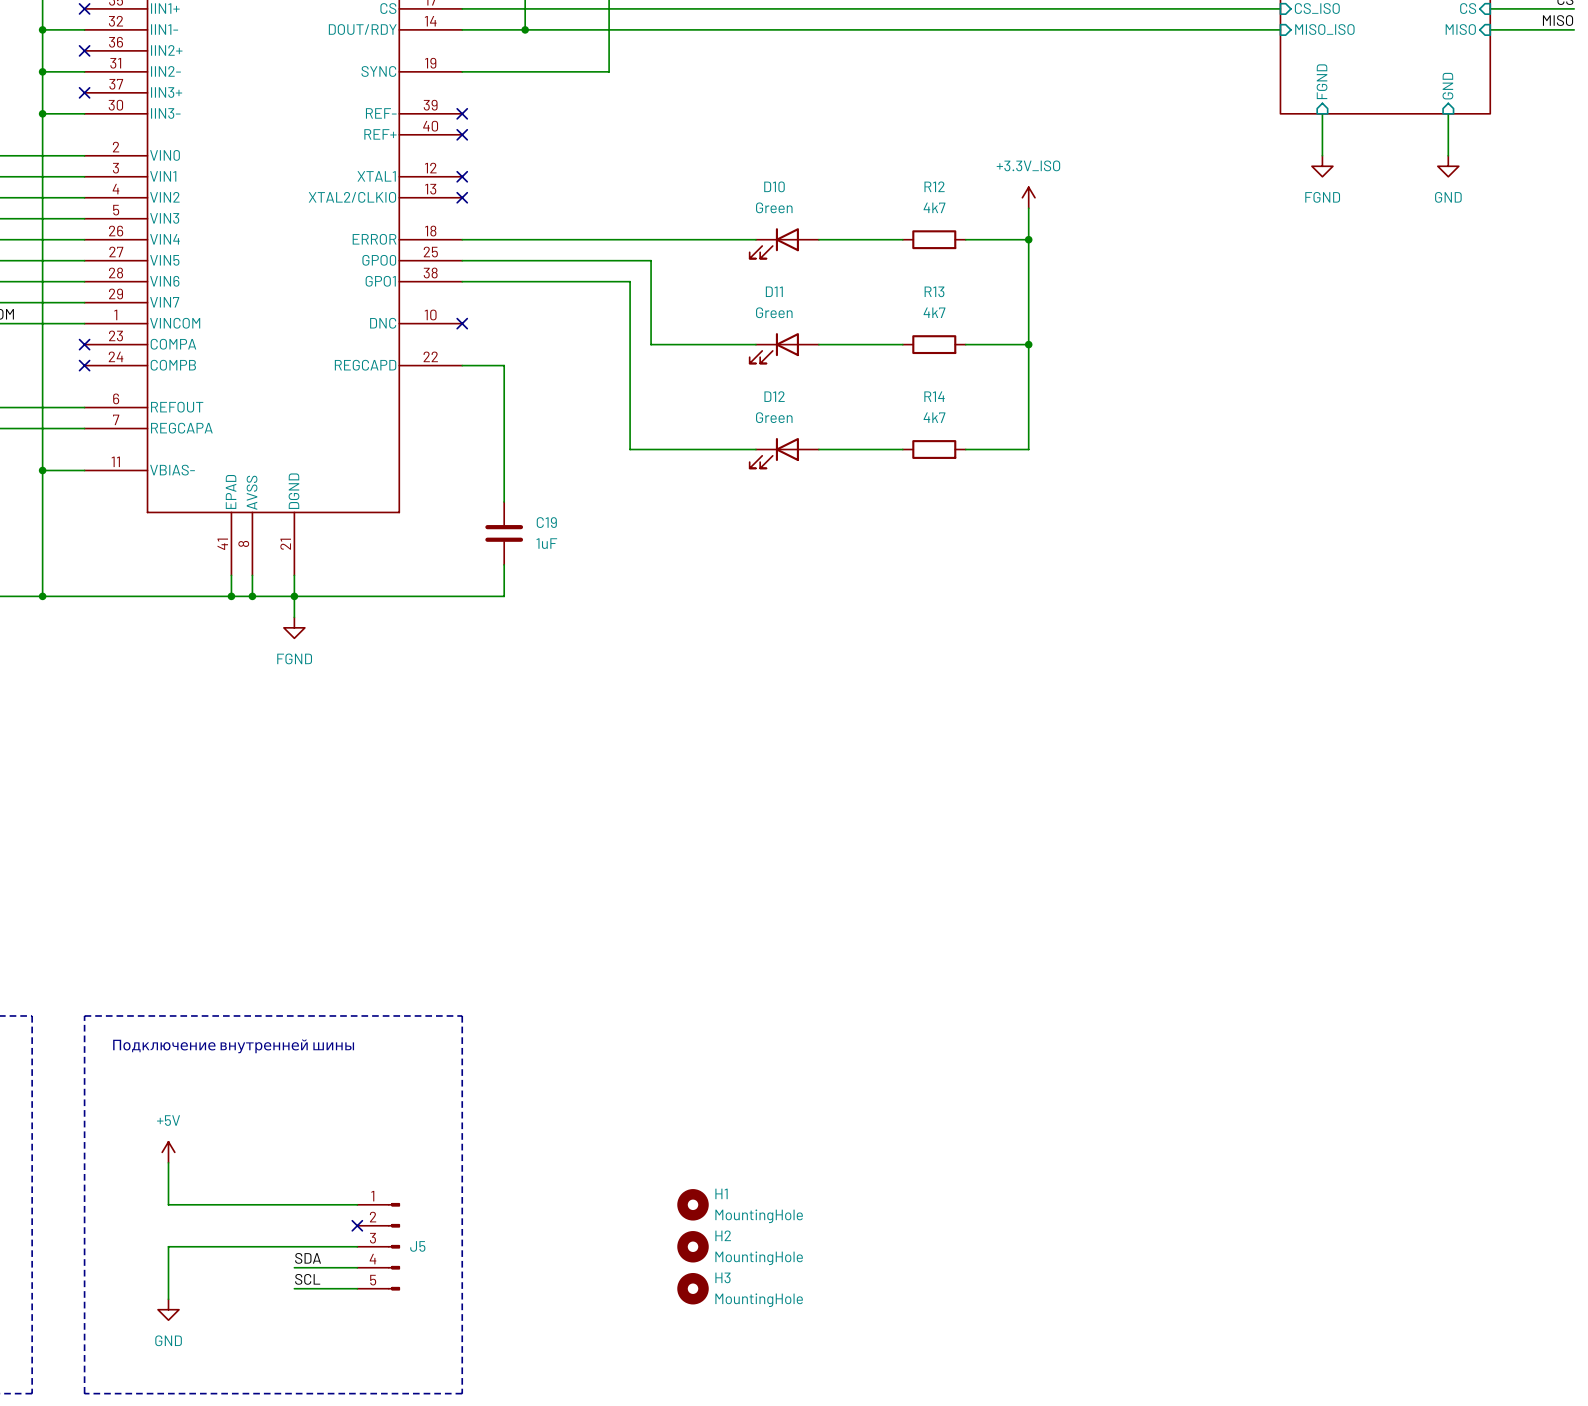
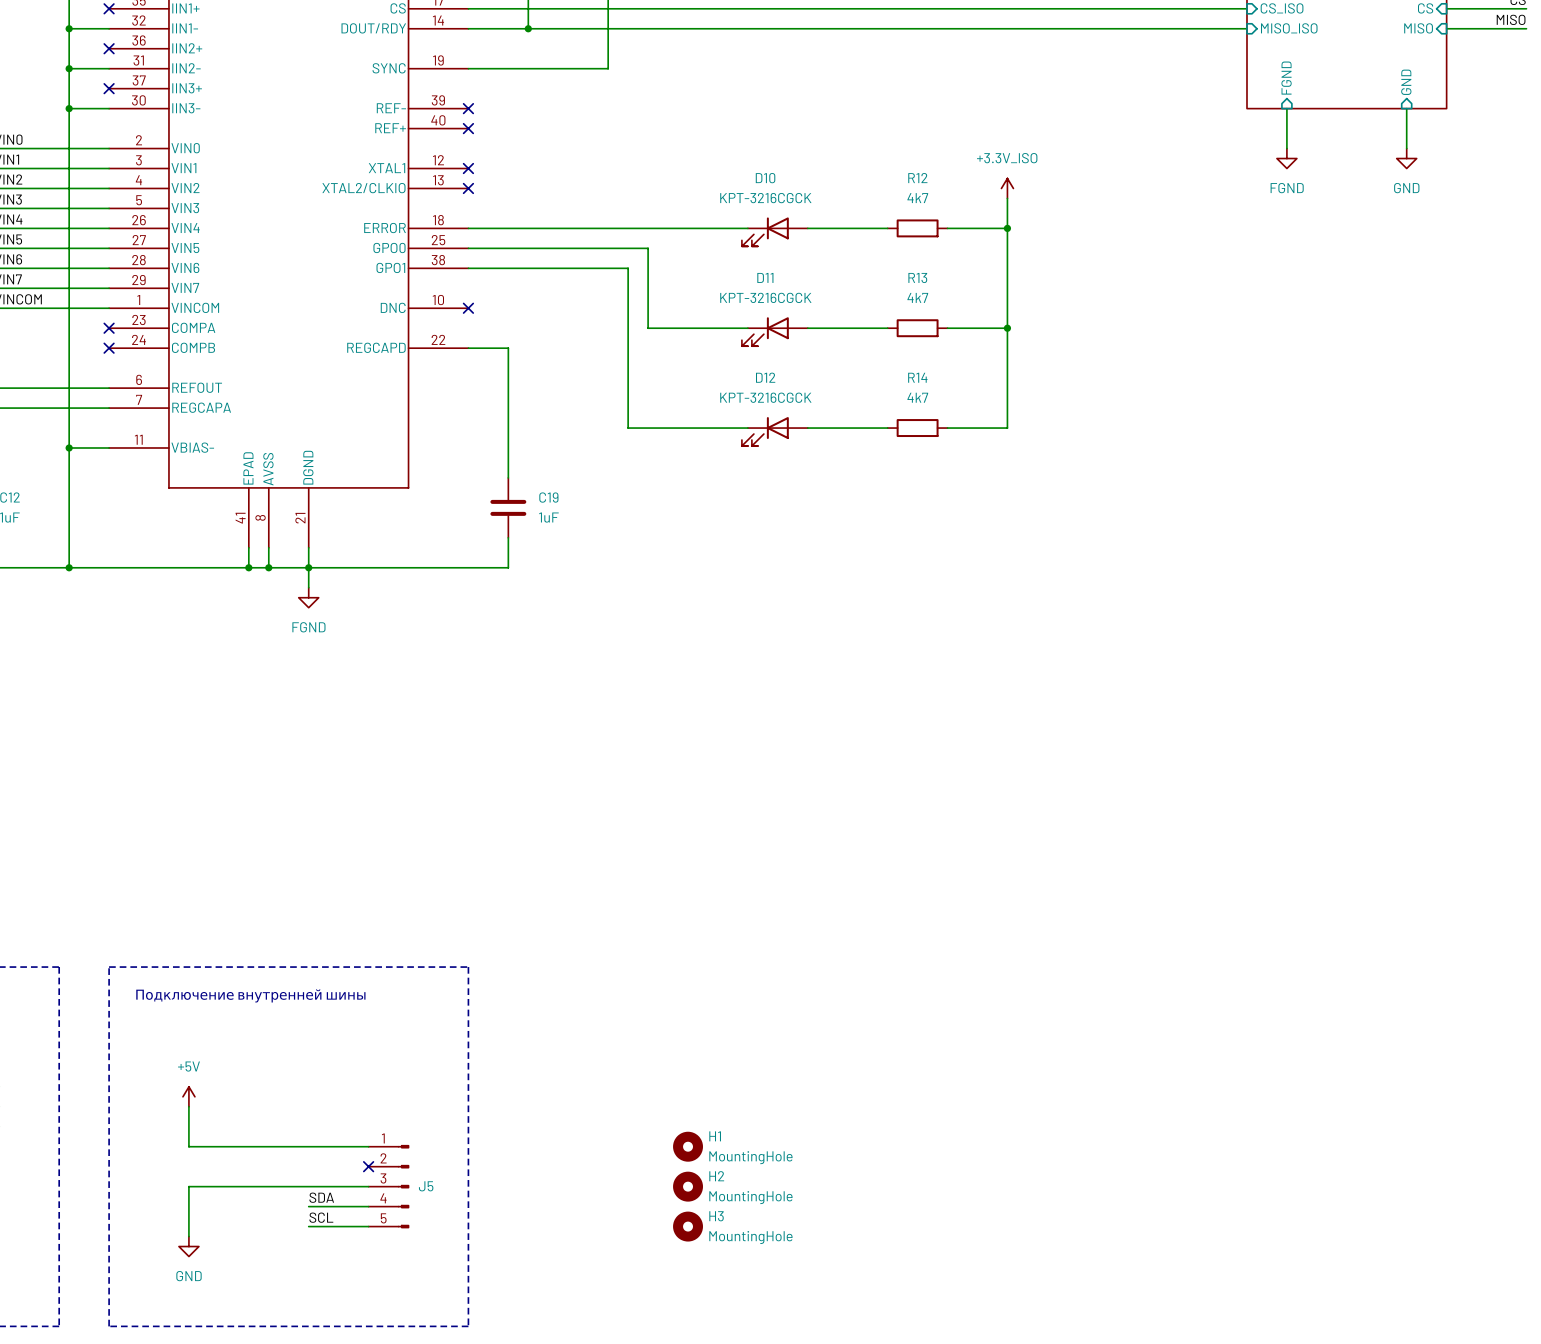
D10 value: Green (774, 207) -> KPT-3216CGCK (765, 198)
D11 value: Green (774, 312) -> KPT-3216CGCK (765, 297)
D12 value: Green (774, 417) -> KPT-3216CGCK (765, 397)

